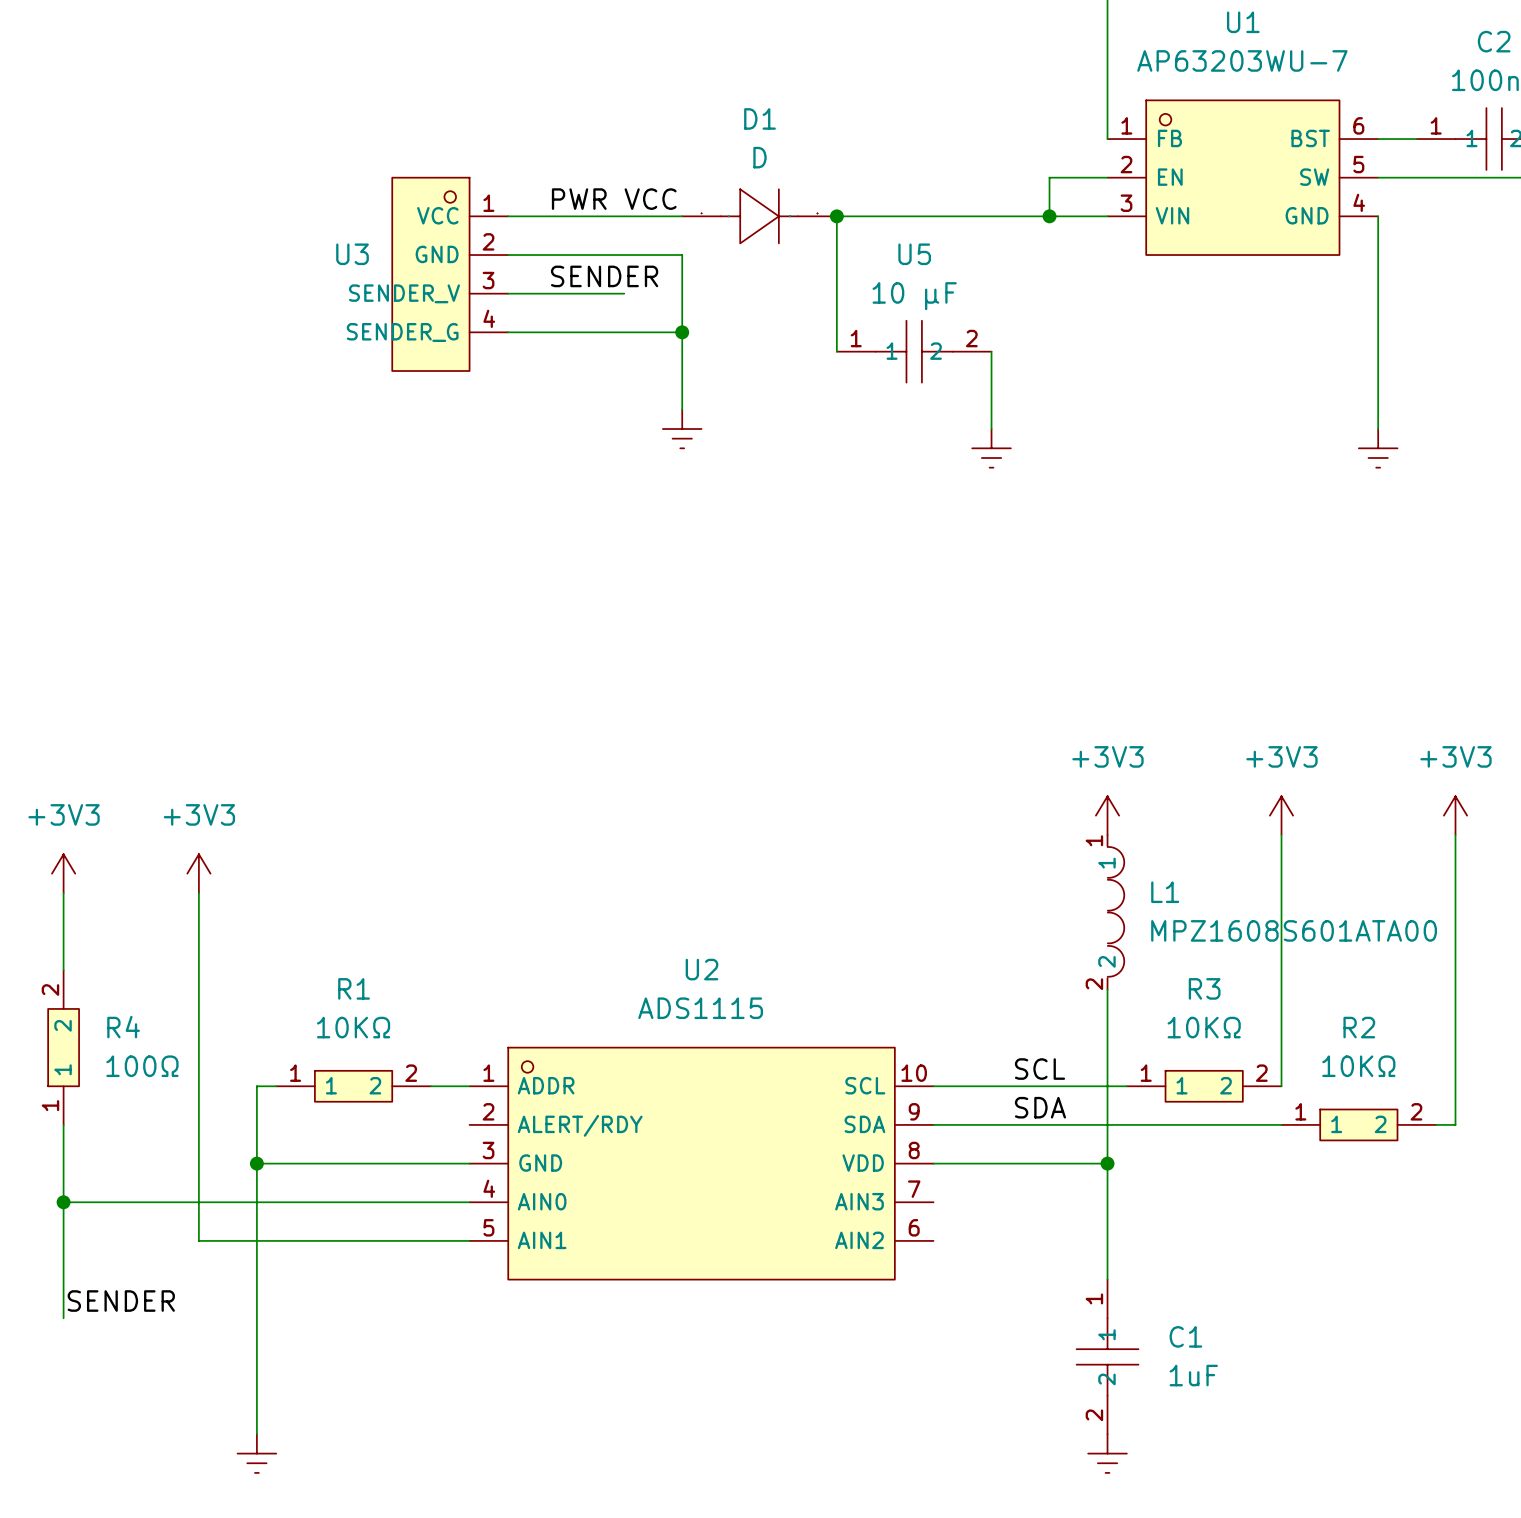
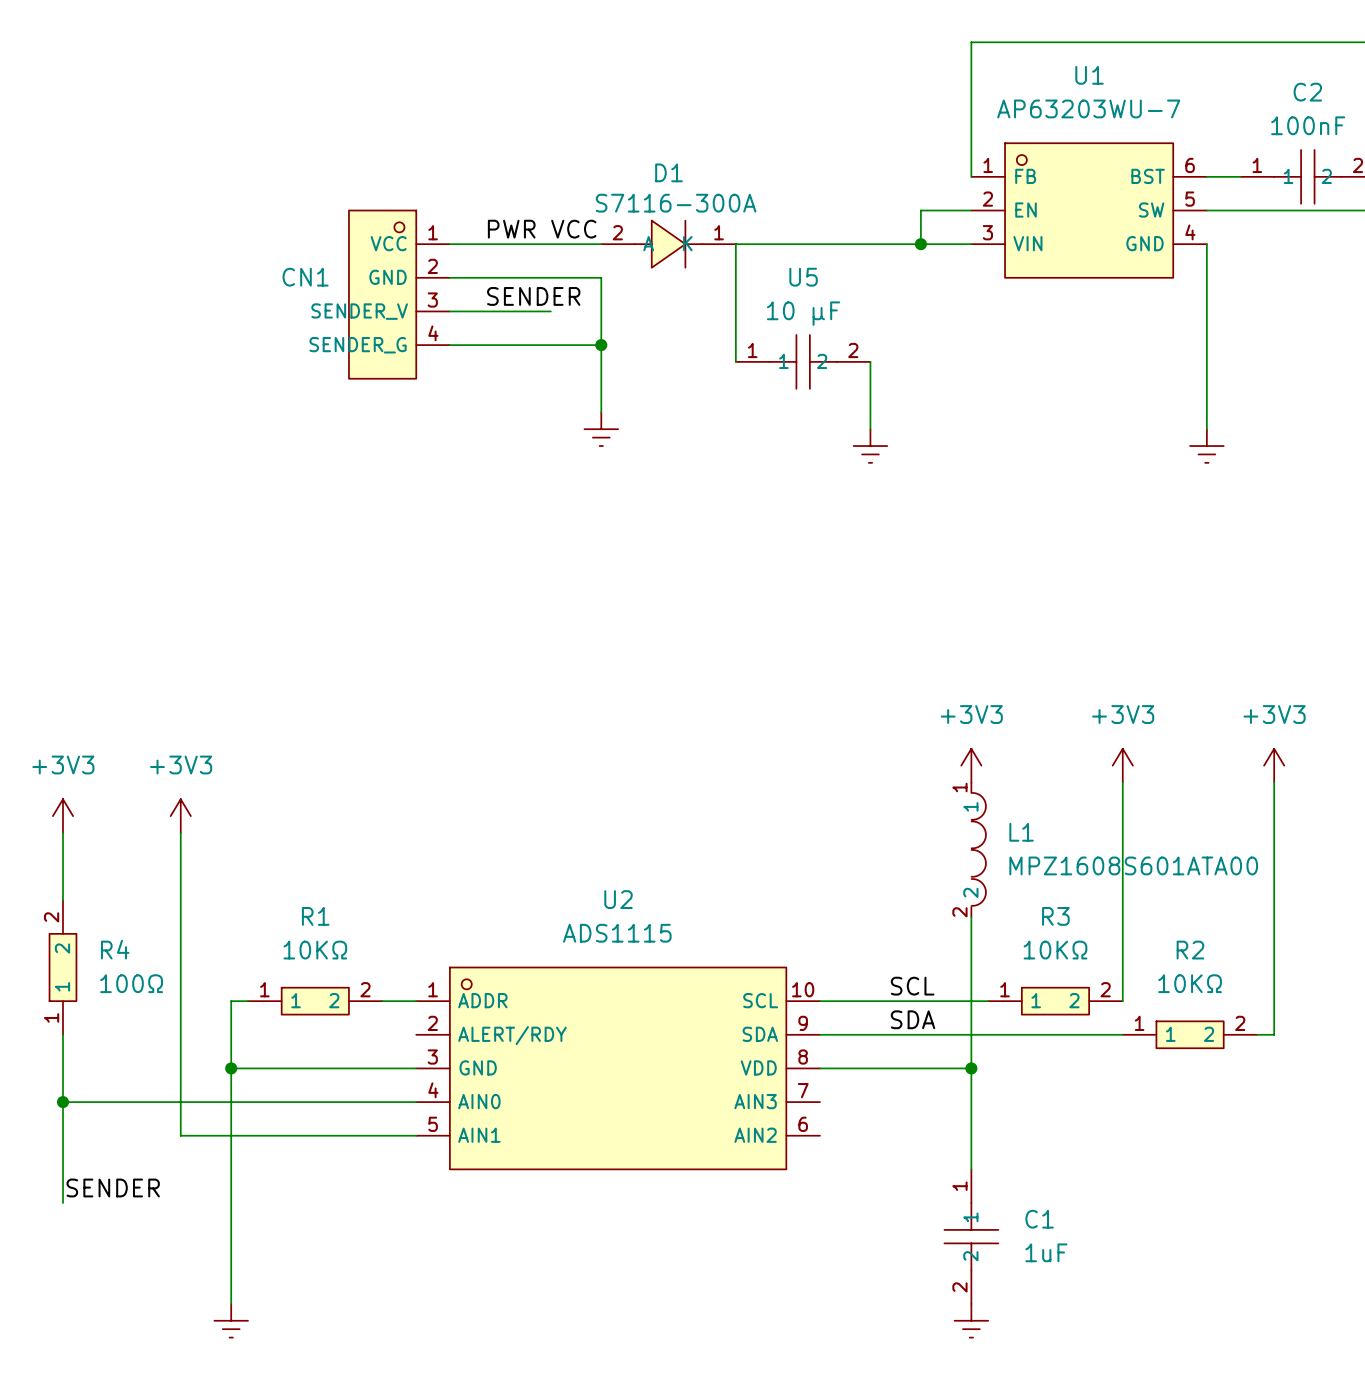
D1 value: D (760, 157) -> S7116-300A (676, 203)
D1 symbol: [682, 189, 837, 244] -> [601, 220, 736, 268]
junction: (836, 216) -> none
U3 name: U3 (352, 254) -> CN1 (305, 277)

